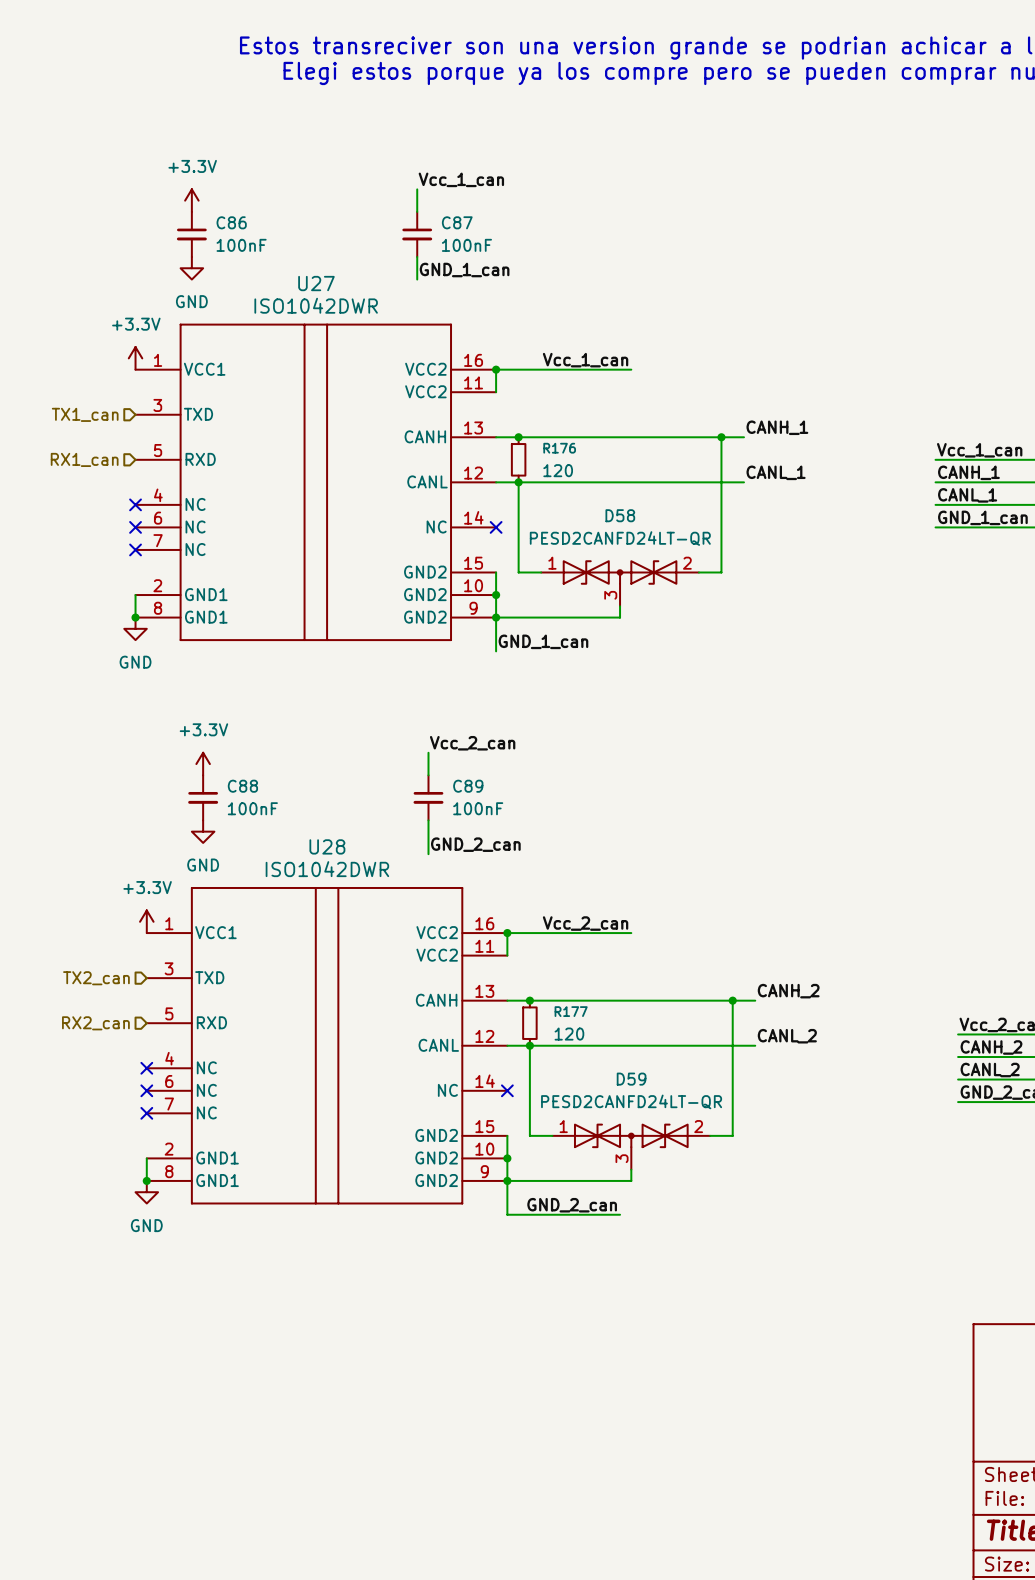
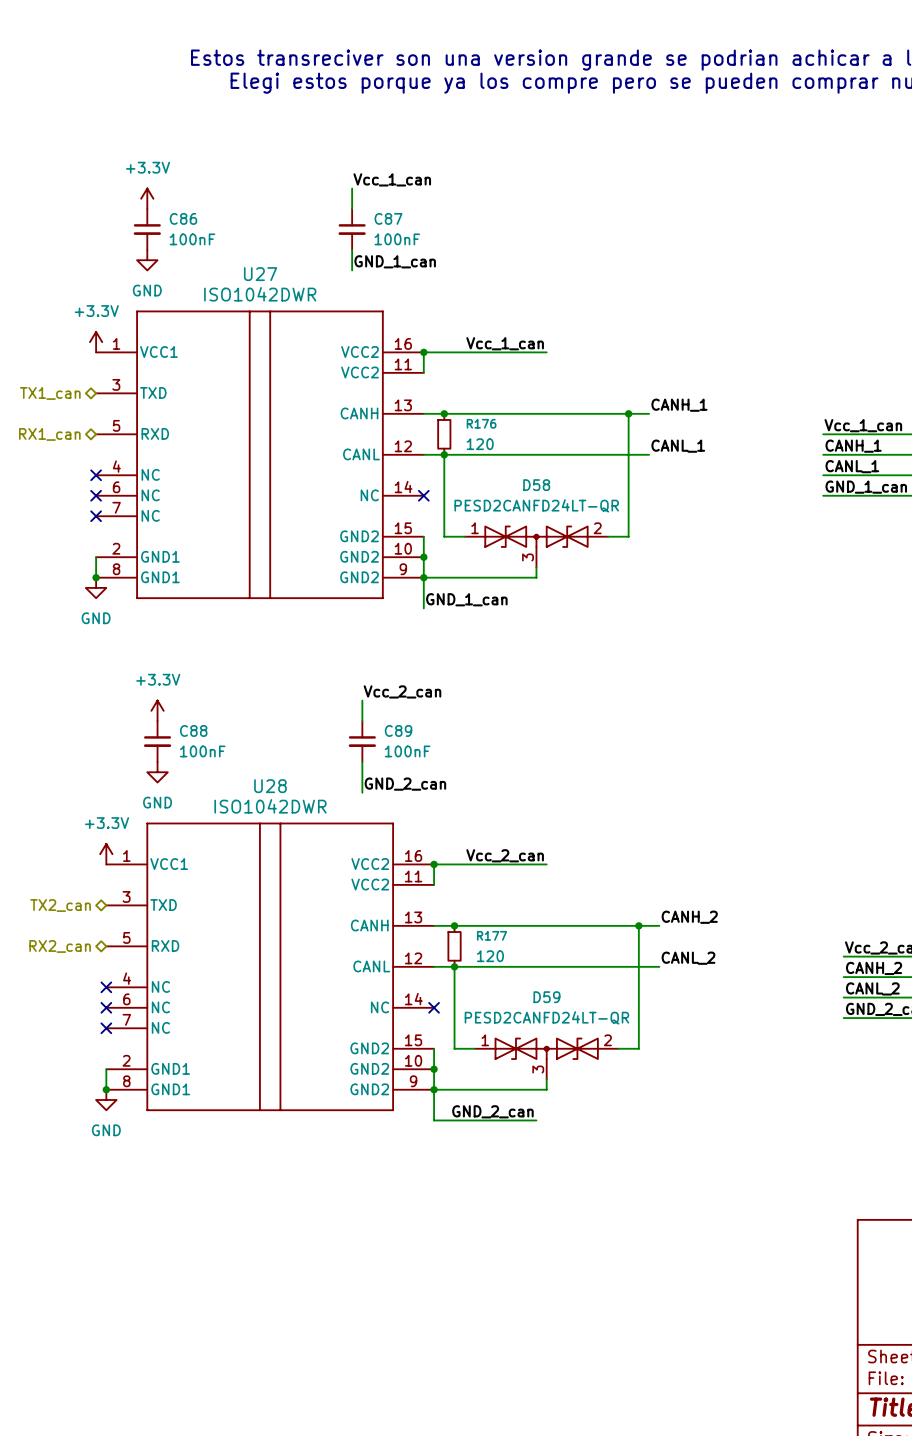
hierarchical label shape: input (85, 414) -> bidirectional (50, 393)
hierarchical label shape: input (84, 459) -> bidirectional (49, 434)
hierarchical label shape: input (96, 978) -> bidirectional (60, 905)
hierarchical label shape: input (95, 1023) -> bidirectional (60, 946)

